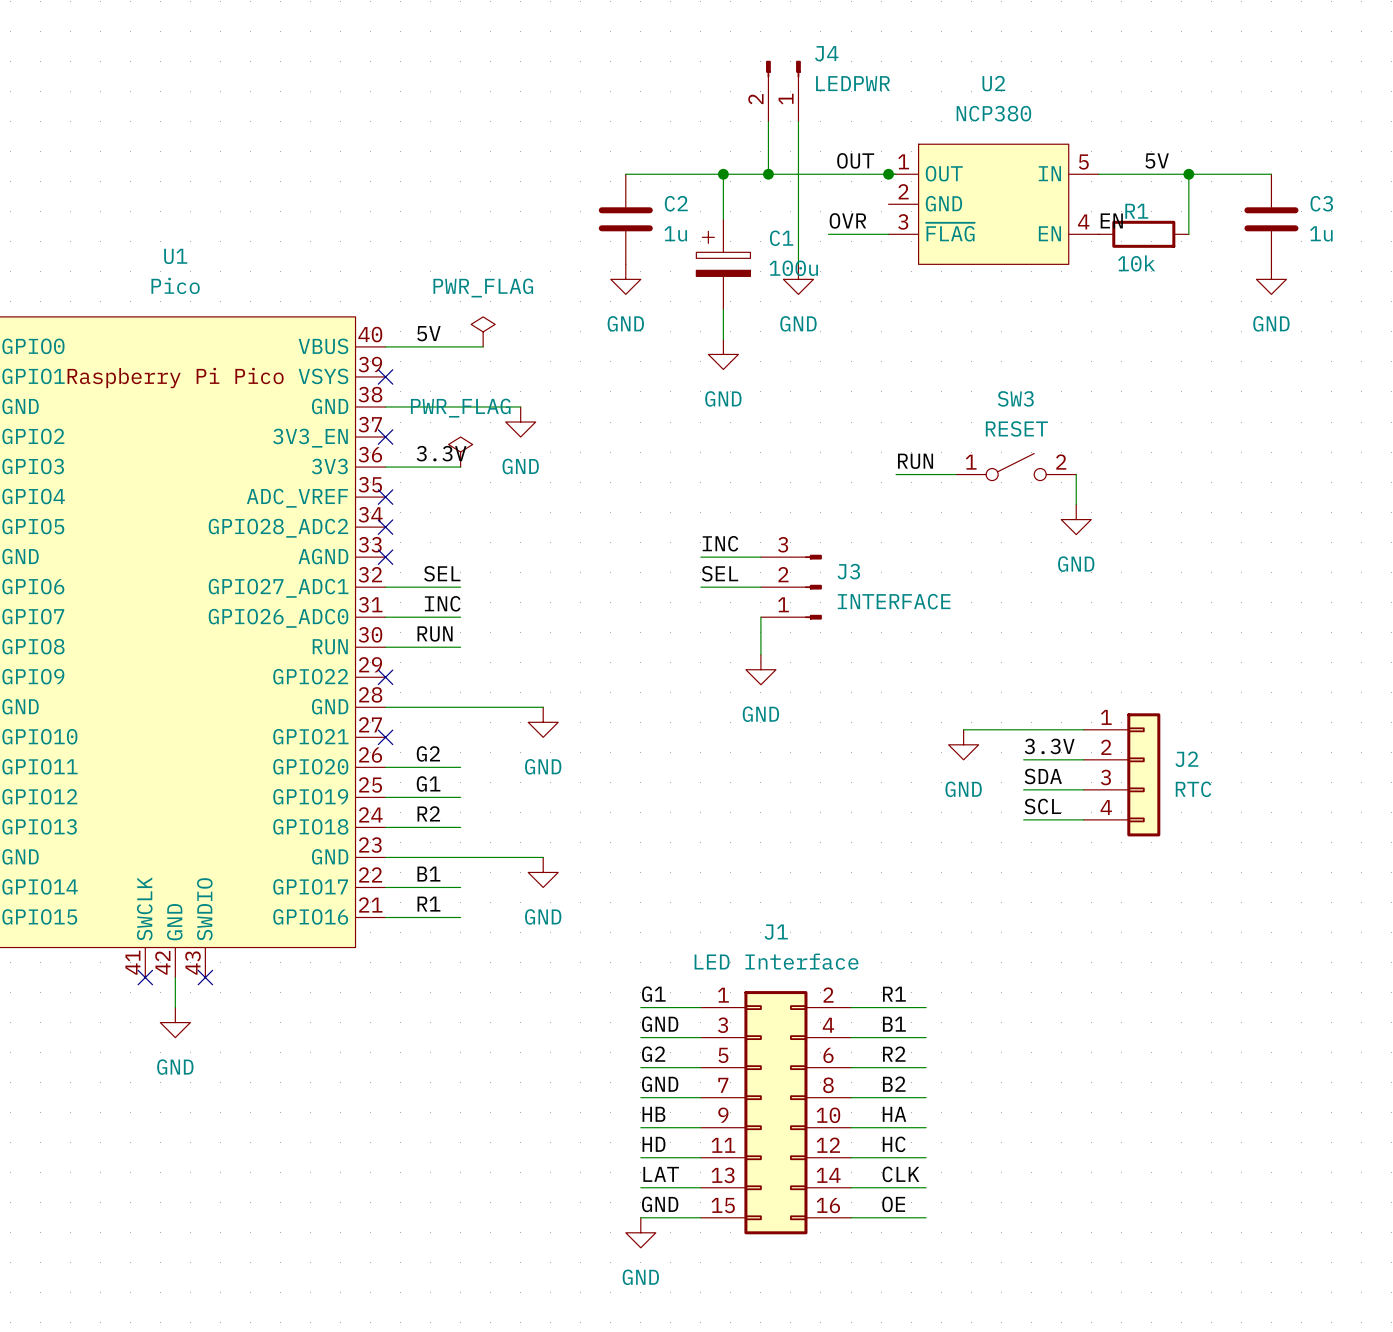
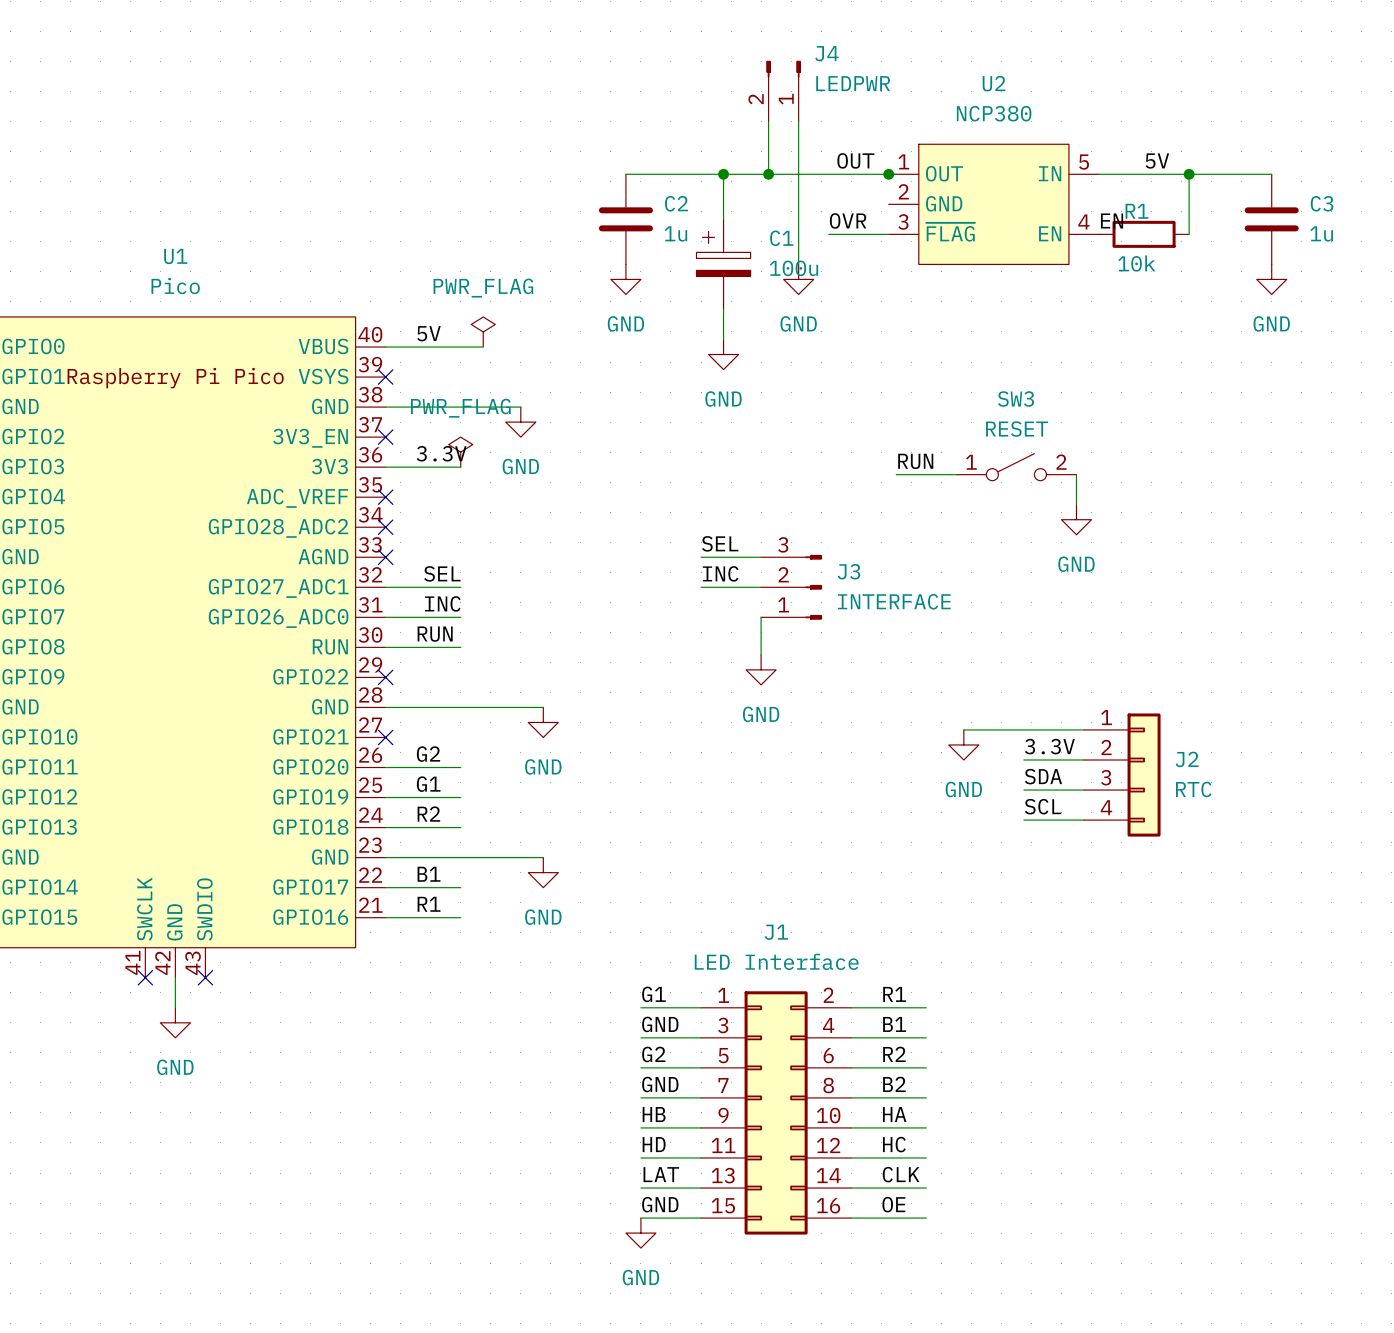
label: INC (720, 543) -> SEL (720, 543)
label: SEL (720, 573) -> INC (720, 573)

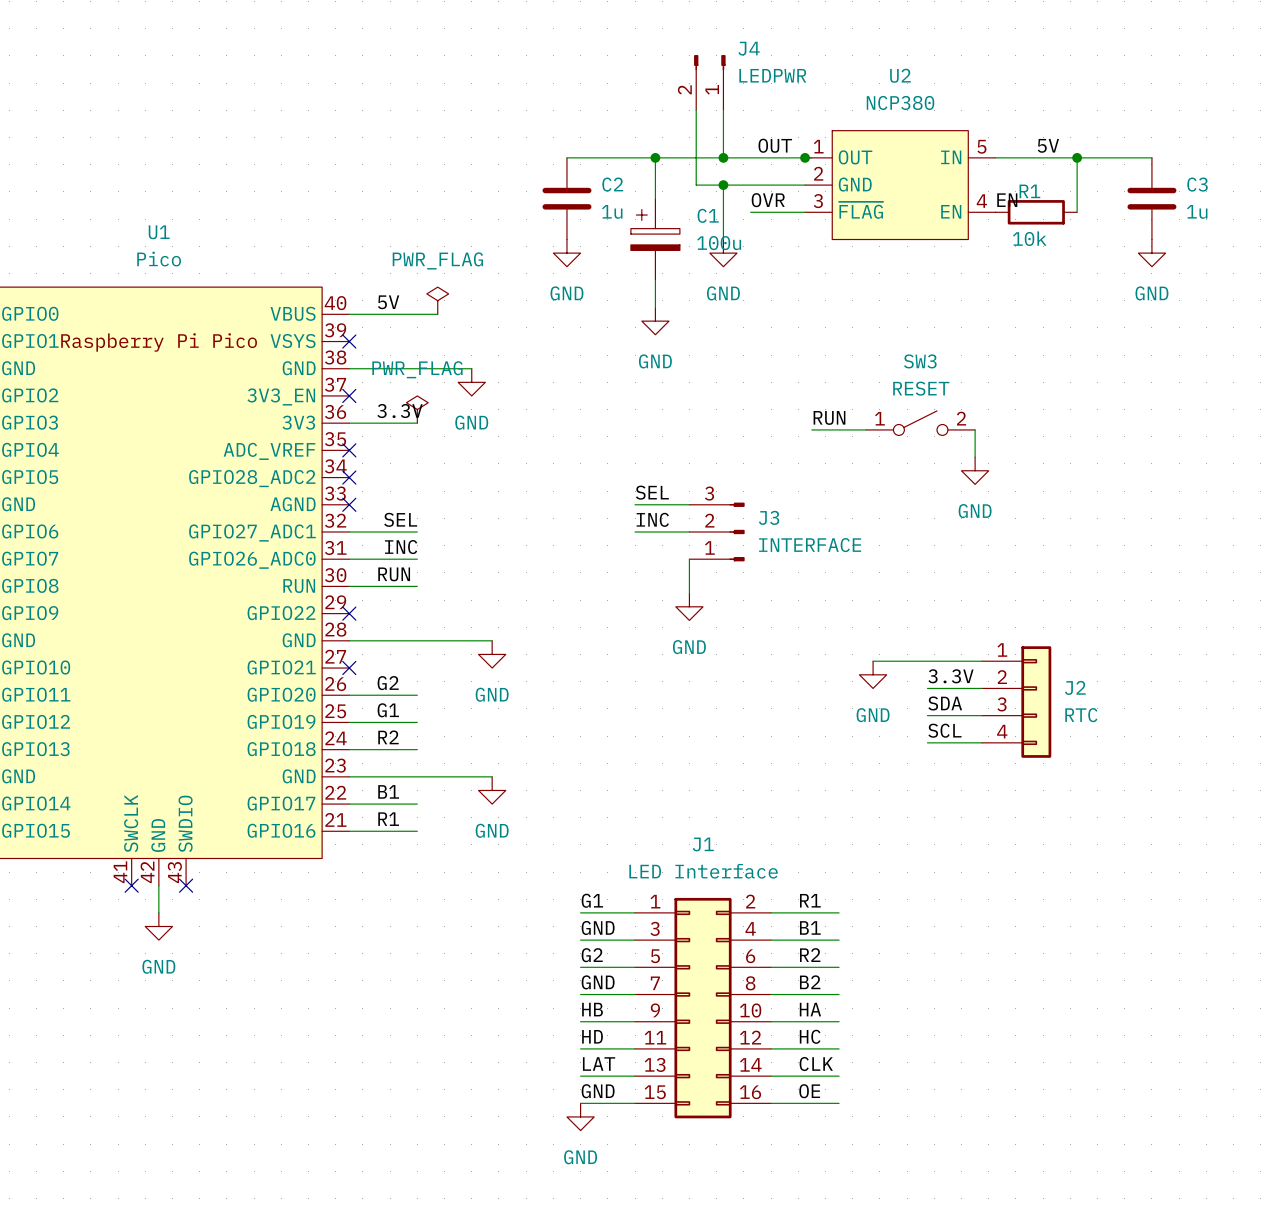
wire: none -> (696, 157) (696, 185) (805, 185)
junction: (768, 174) -> none
wire: (798, 174) (798, 204) -> none
junction: none -> (723, 157)
junction: none -> (723, 185)

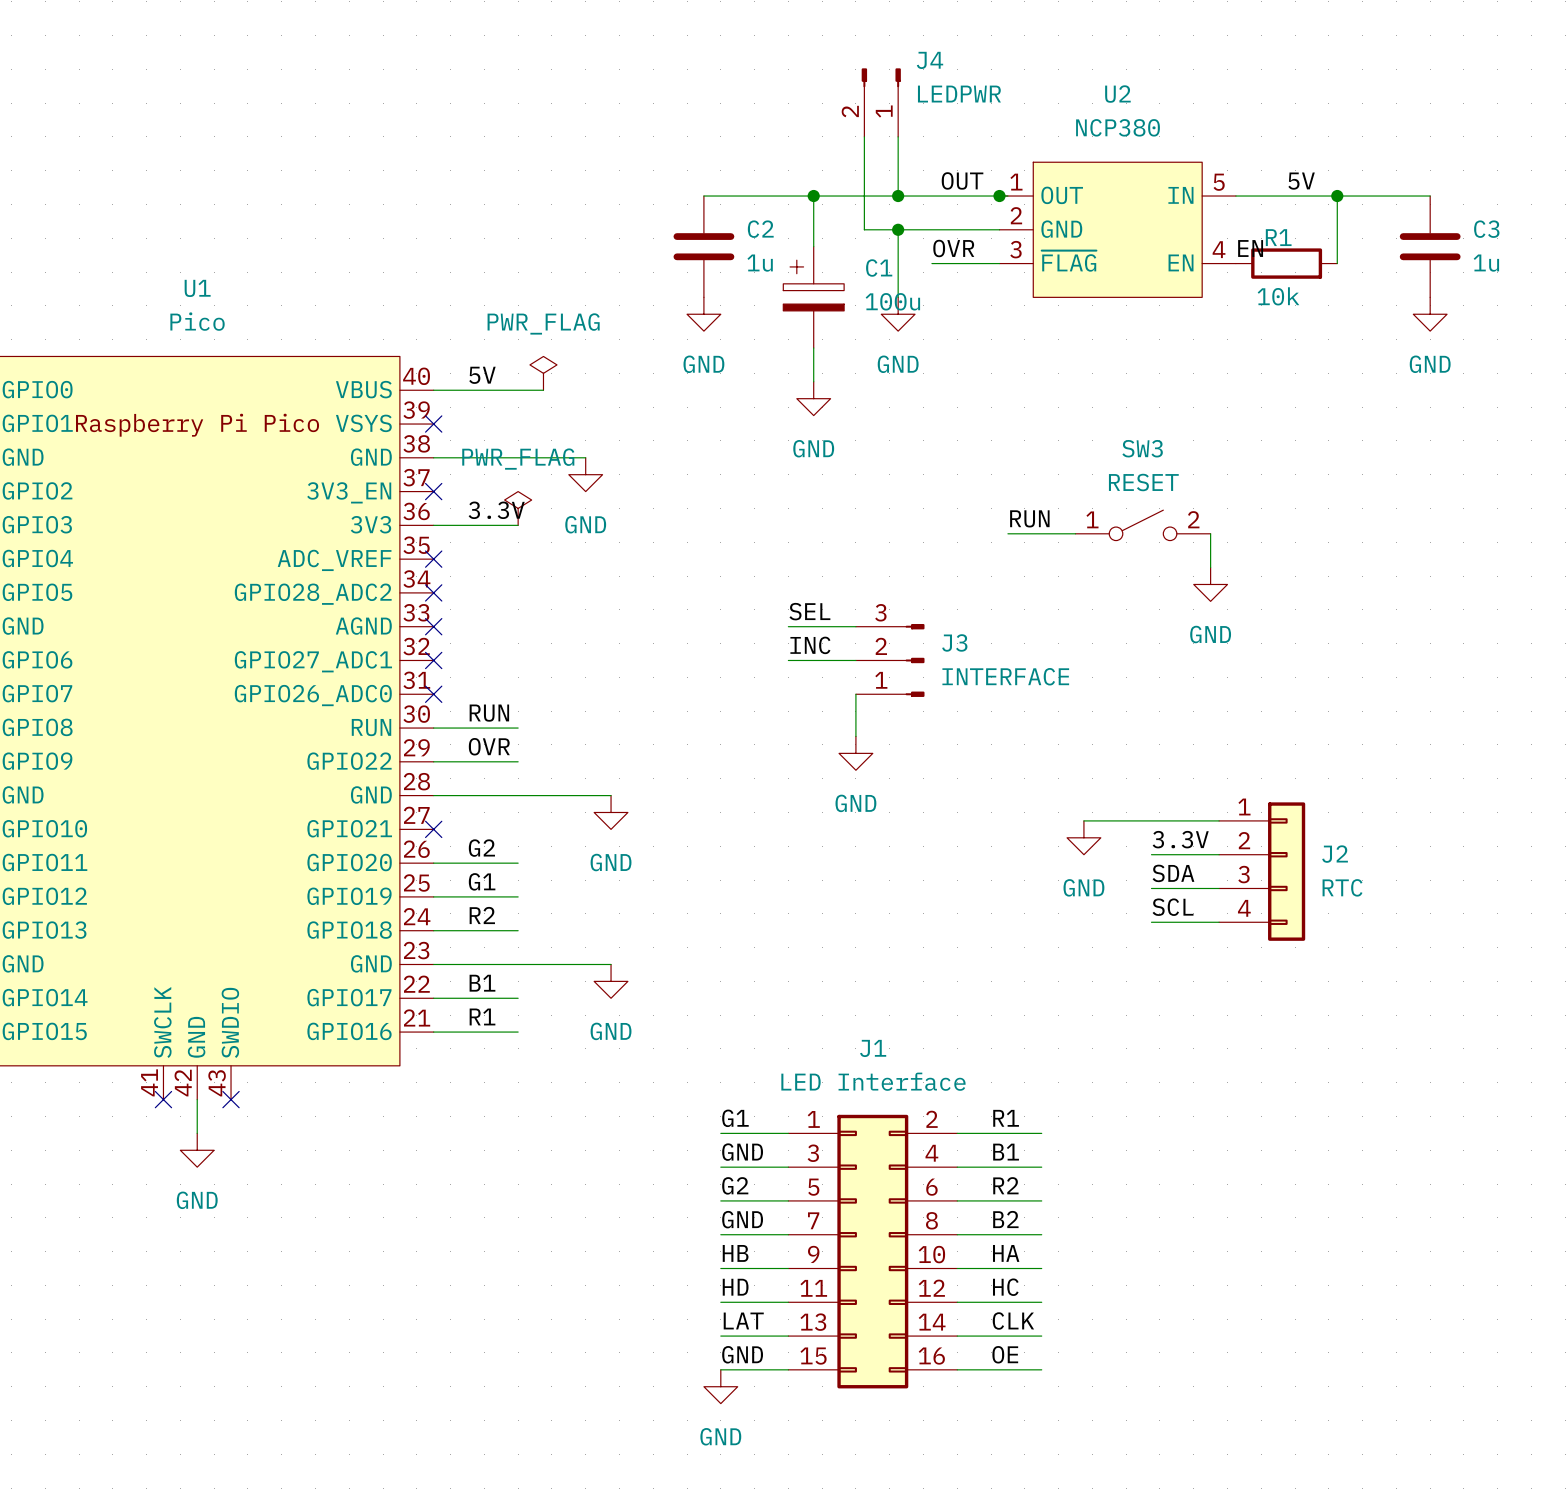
label: SEL (400, 519) -> none
wire: (349, 531) (417, 531) -> none
no-connect mark: none -> (433, 660)
label: INC (401, 547) -> none
wire: (349, 559) (417, 559) -> (433, 761) (518, 761)
no-connect mark: none -> (433, 694)
label: none -> OVR (489, 746)
no-connect mark: (349, 613) -> none

